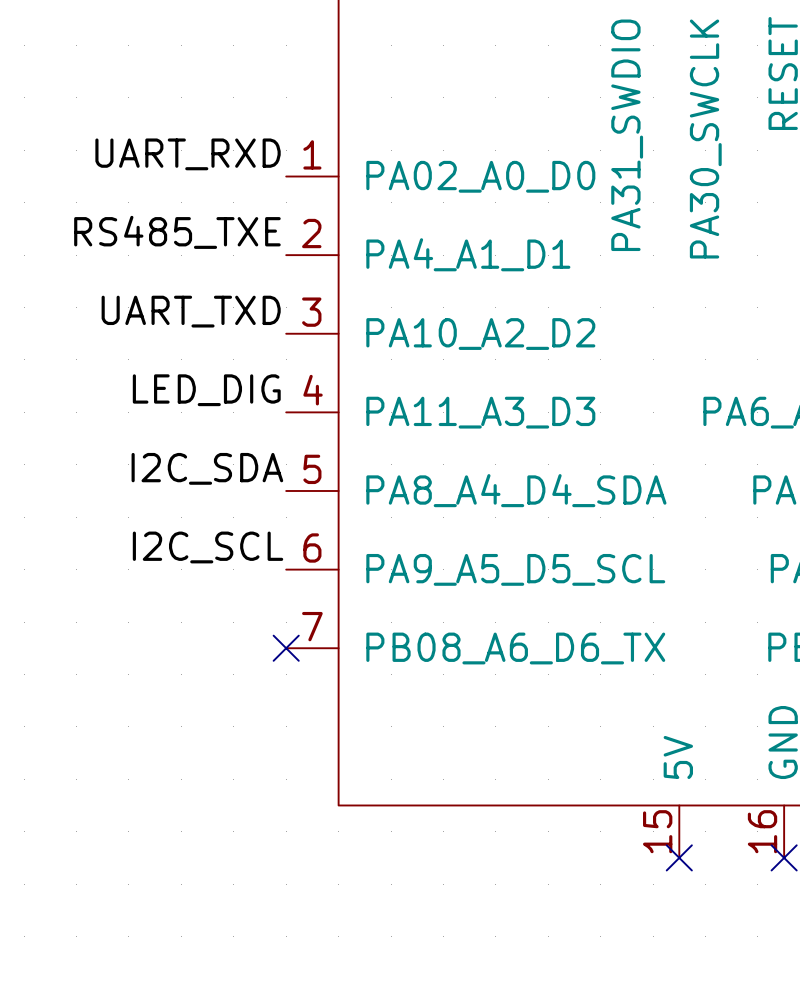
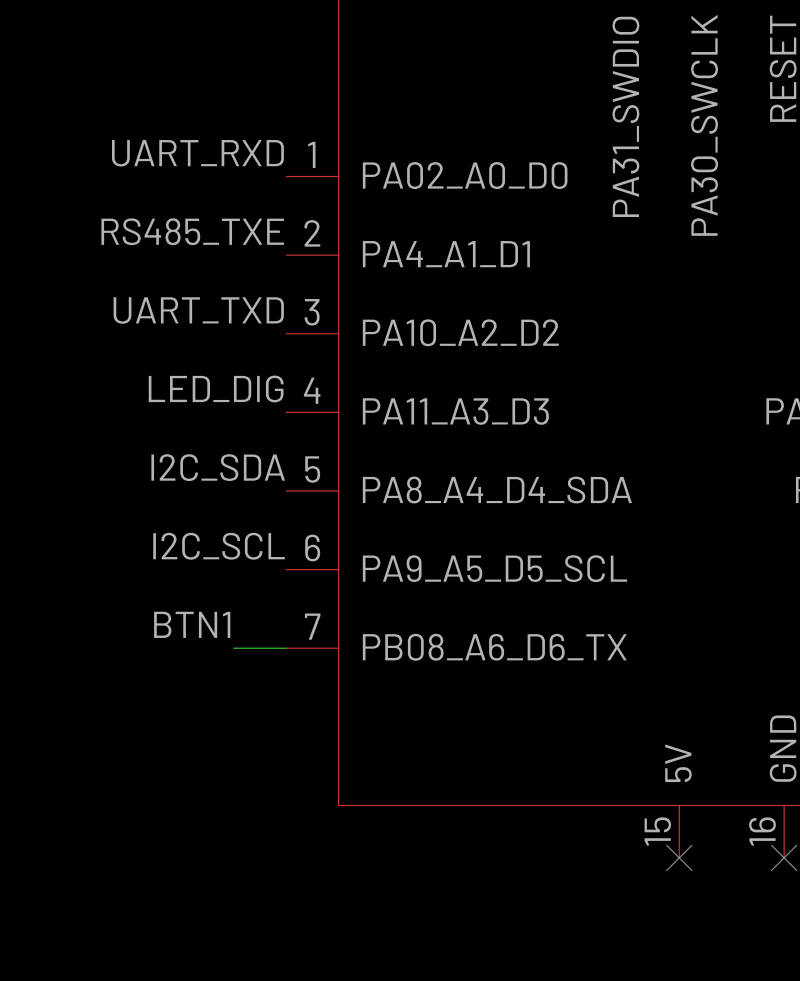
label: none -> BTN1 (192, 624)
wire: none -> (233, 648) (286, 648)
no-connect mark: (286, 648) -> none

